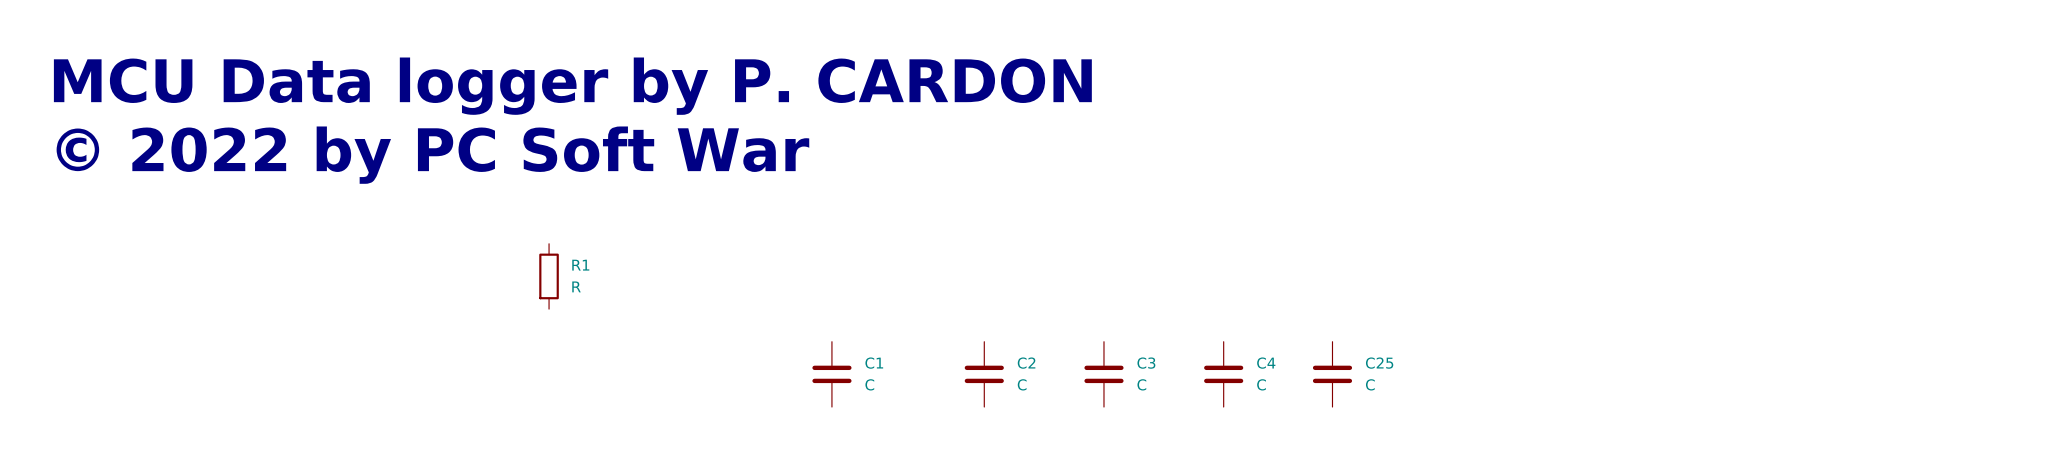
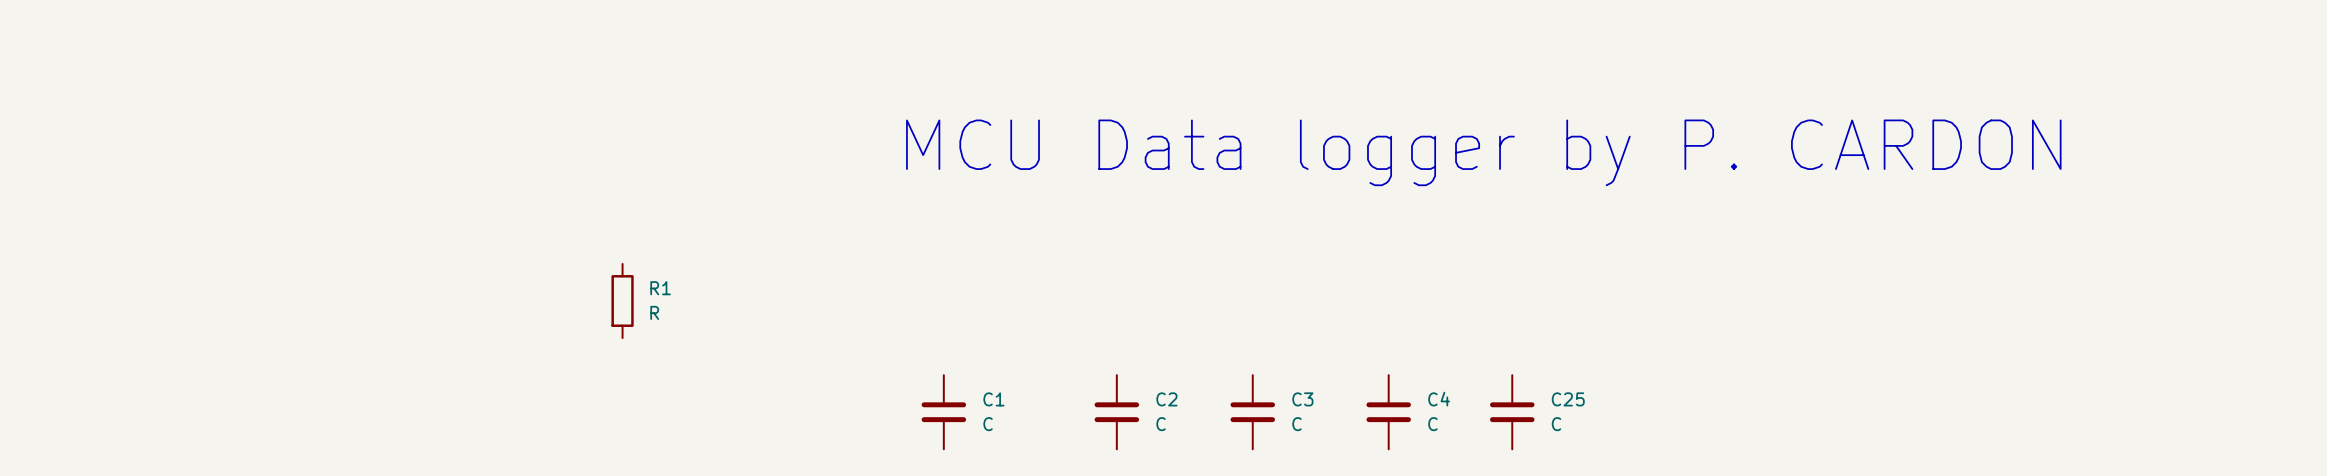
text: MCU Data logger by P. CARDON (572, 86) -> none
text: none -> MCU Data logger by P. CARDON (1483, 152)
text: © 2022 by PC Soft War (432, 155) -> none

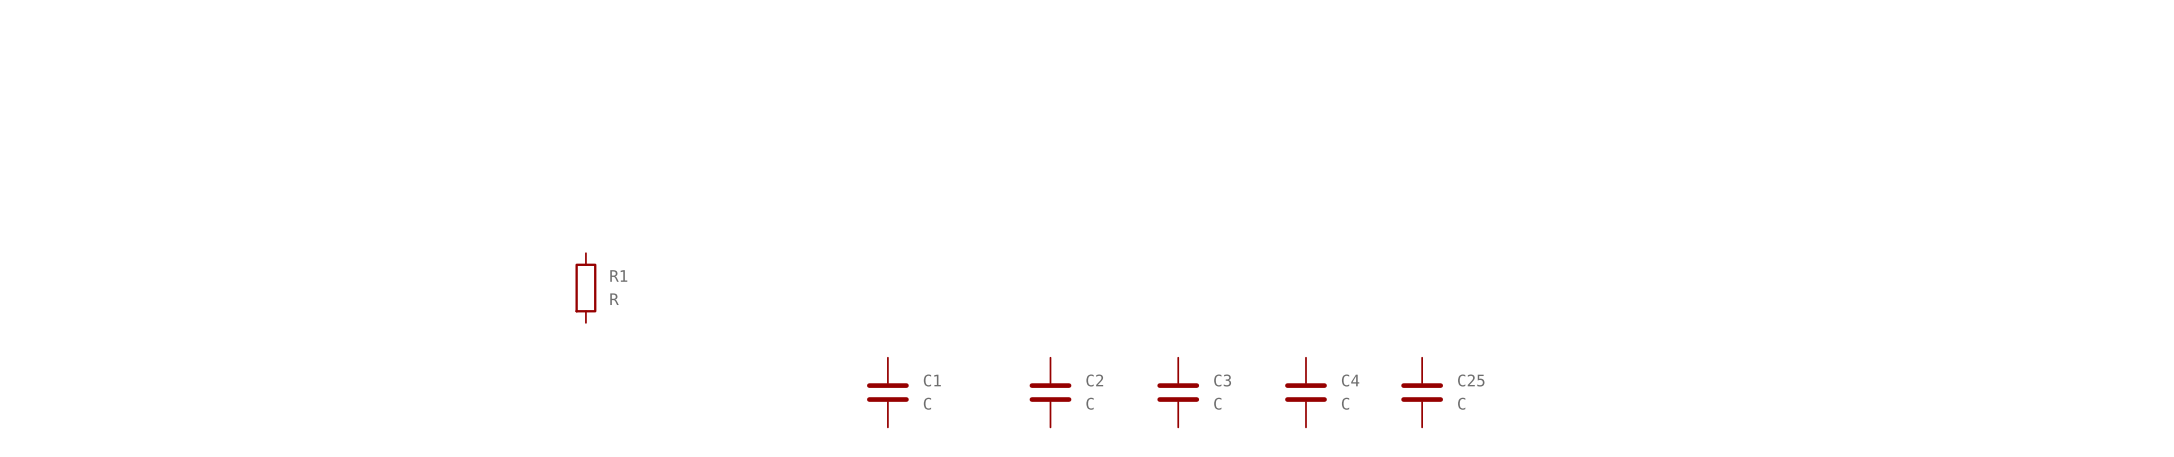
text: MCU Data logger by P. CARDON (1483, 152) -> none

